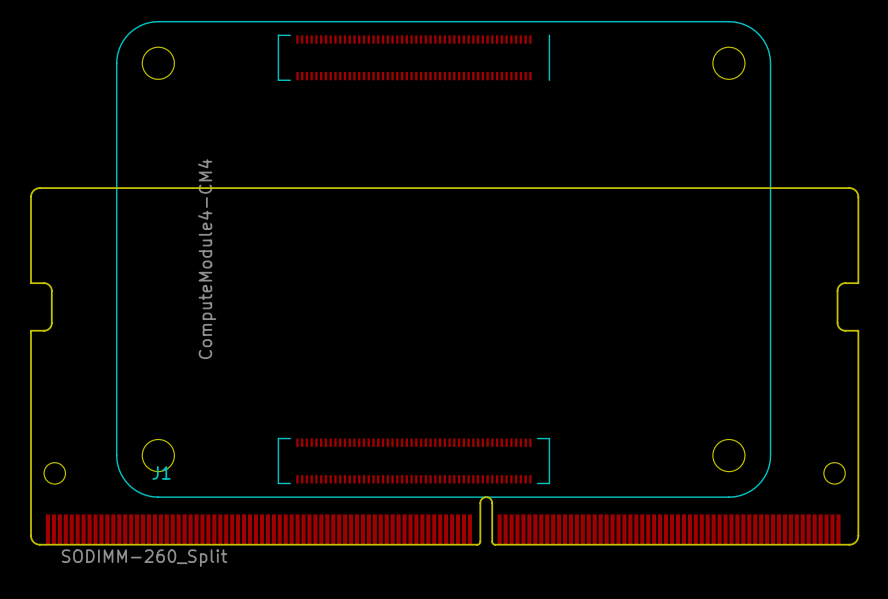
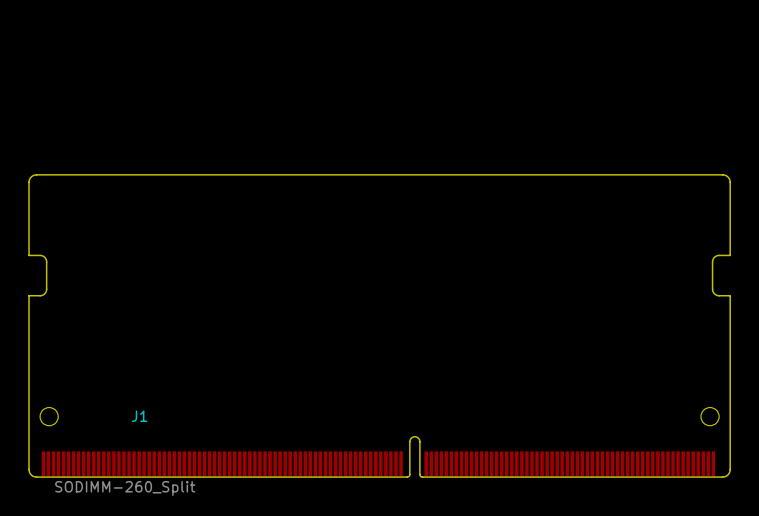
part: ComputeModule4-CM4 (443, 259) -> none

